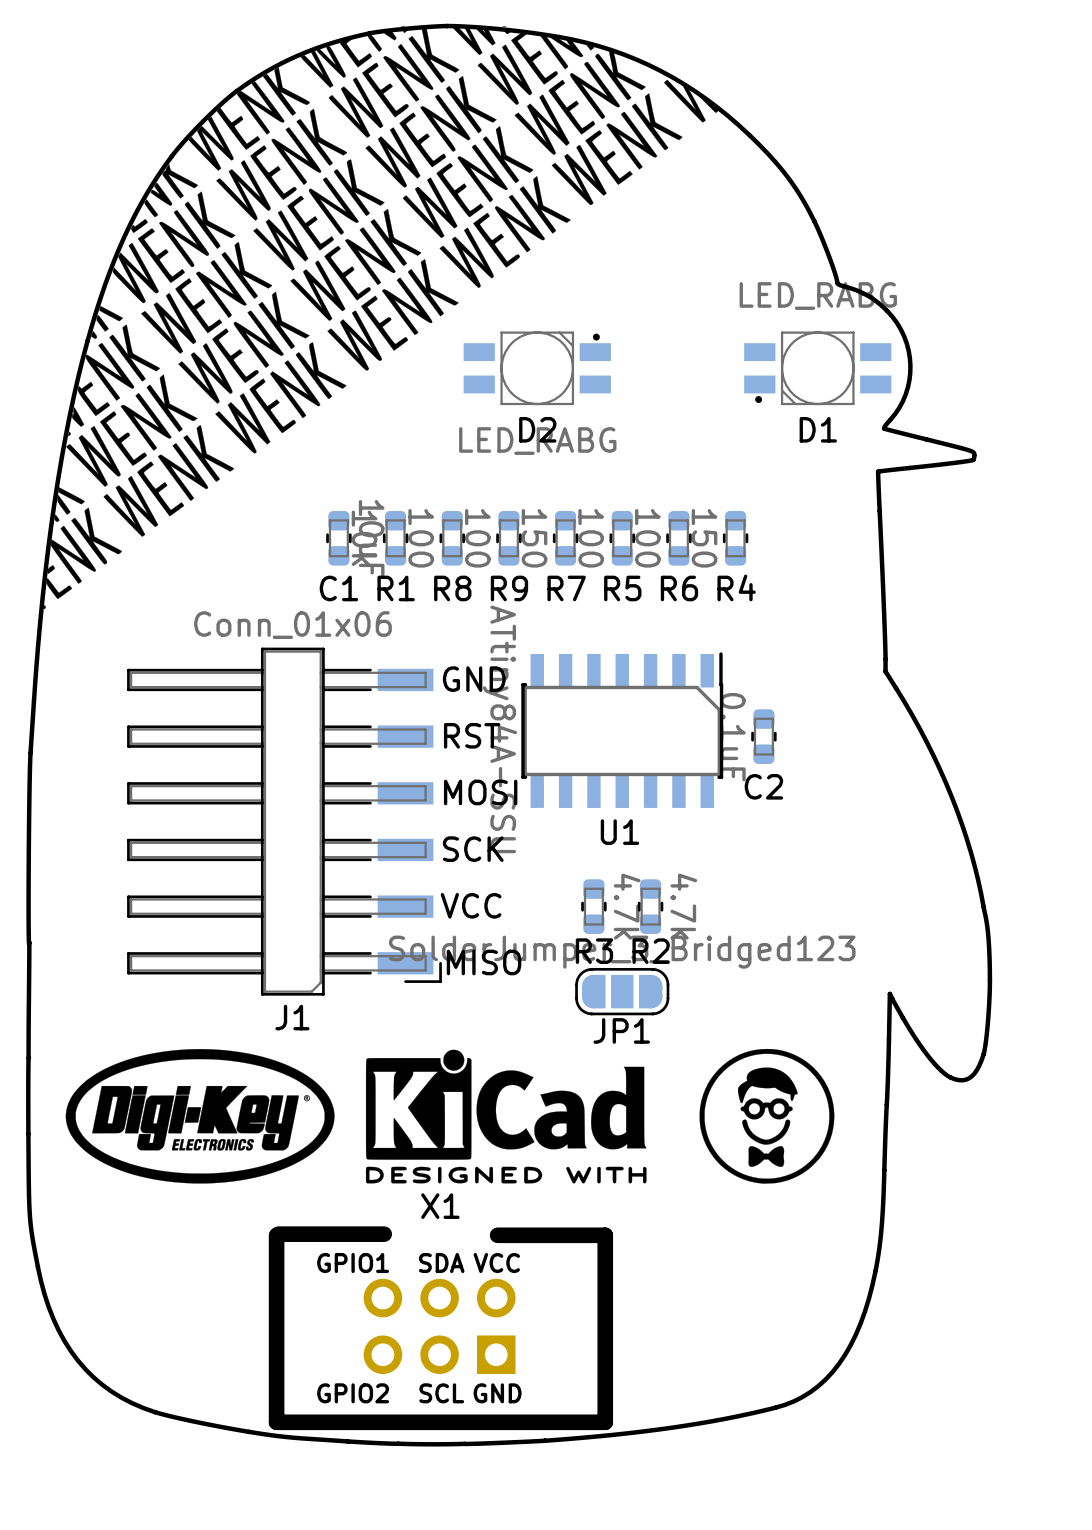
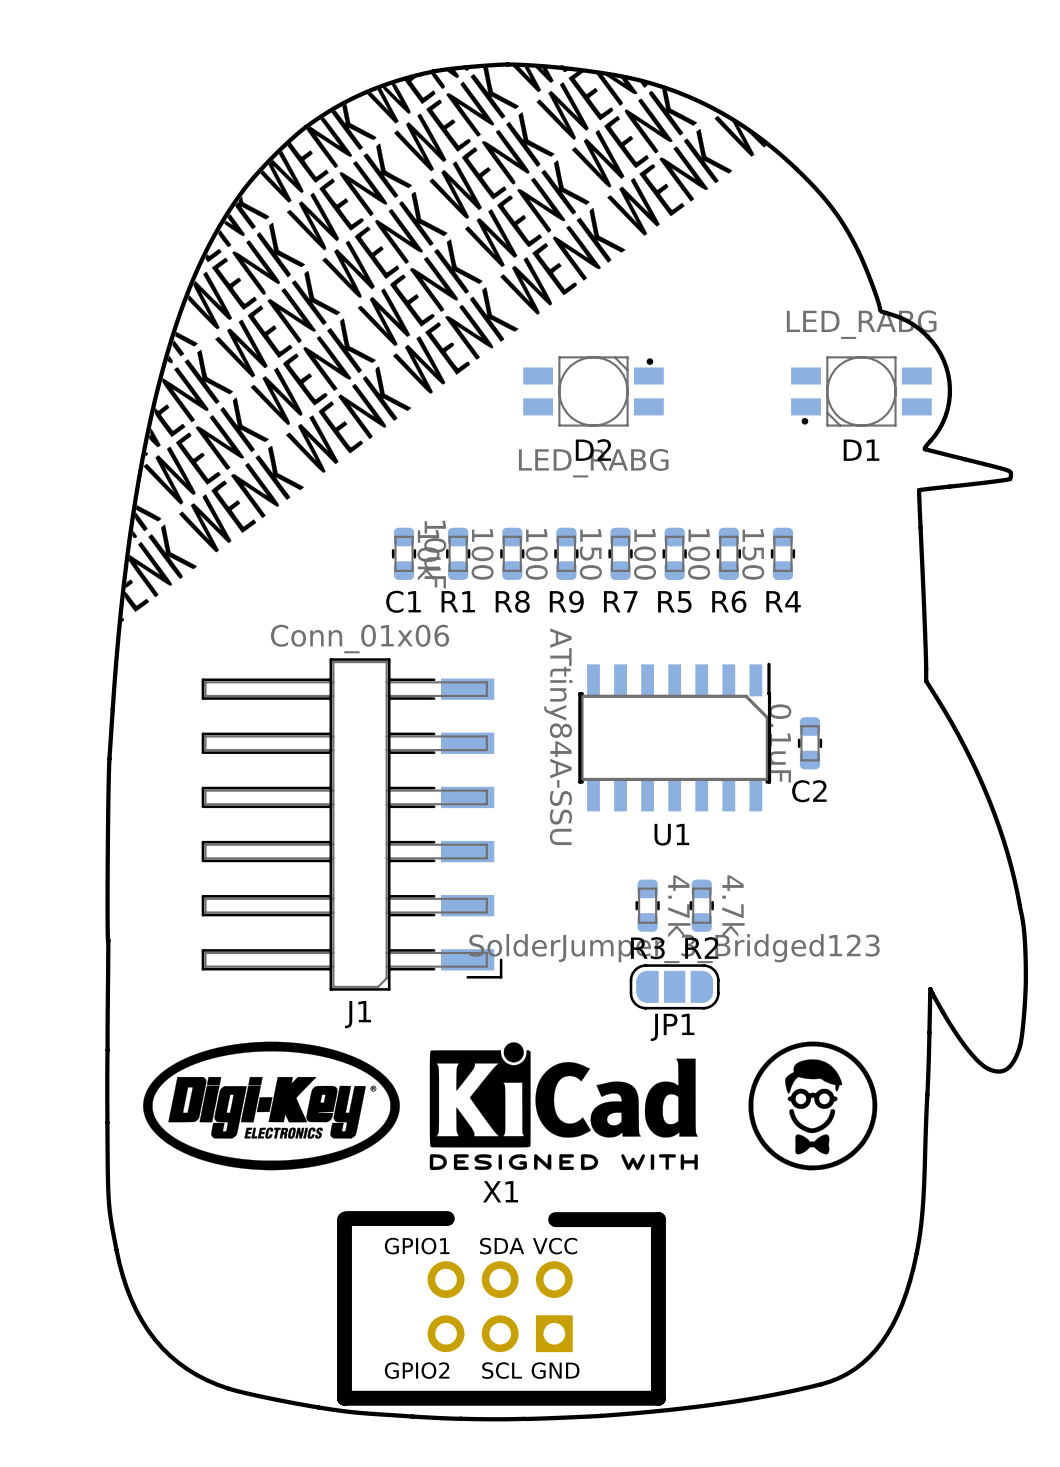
text: GND (474, 679) -> none
text: RST (472, 735) -> none
text: MOSI (480, 792) -> none
text: SCK (473, 849) -> none
text: VCC (471, 905) -> none
text: MISO (484, 962) -> none

